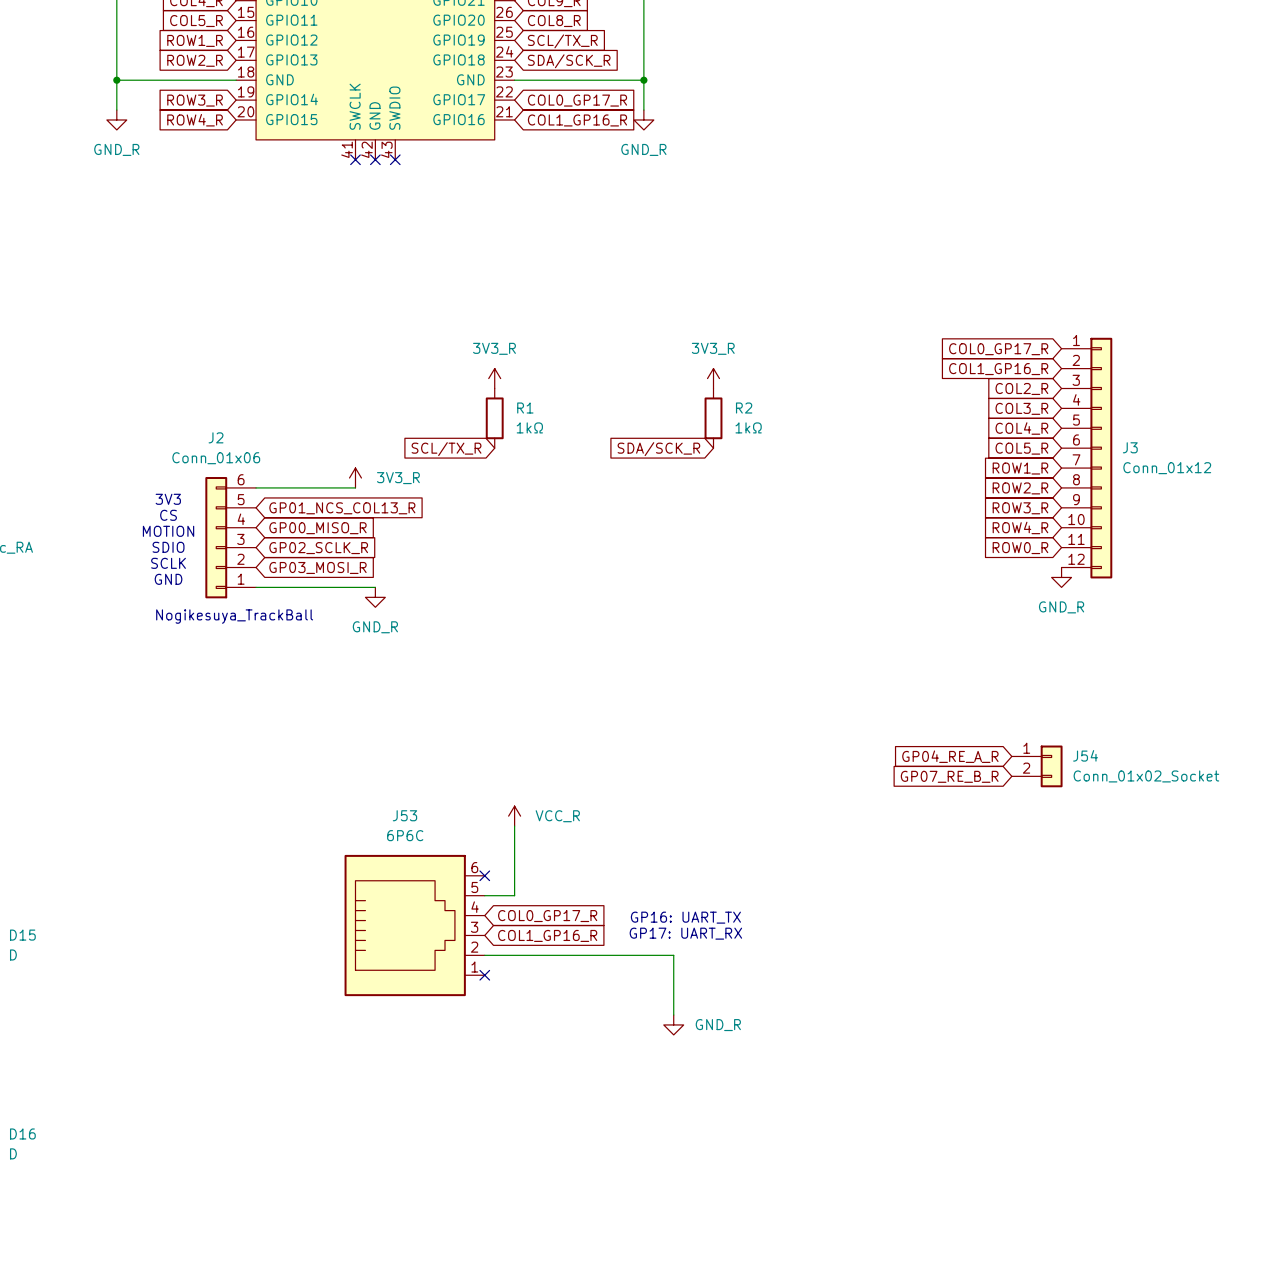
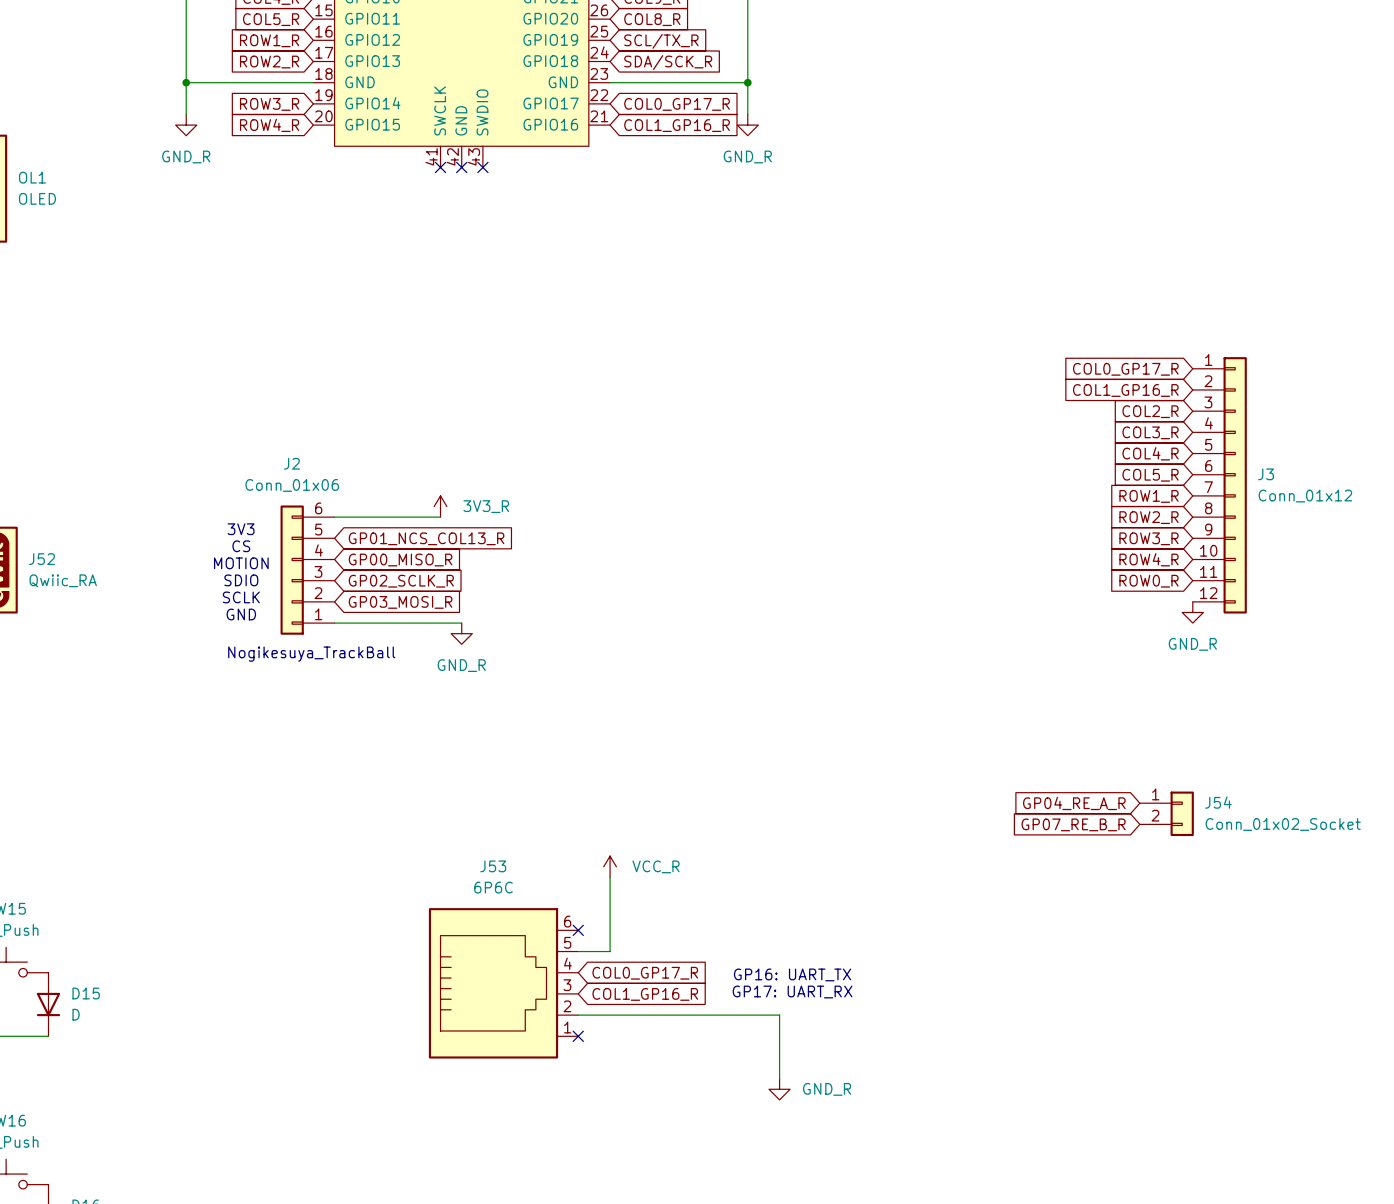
power symbol: 3V3_R (494, 378) -> none
power symbol: 3V3_R (713, 378) -> none
R1: 1kΩ (494, 418) -> none
R2: 1kΩ (713, 418) -> none
global label: SCL/TX_R (446, 449) -> none
global label: SDA/SCK_R (658, 449) -> none

